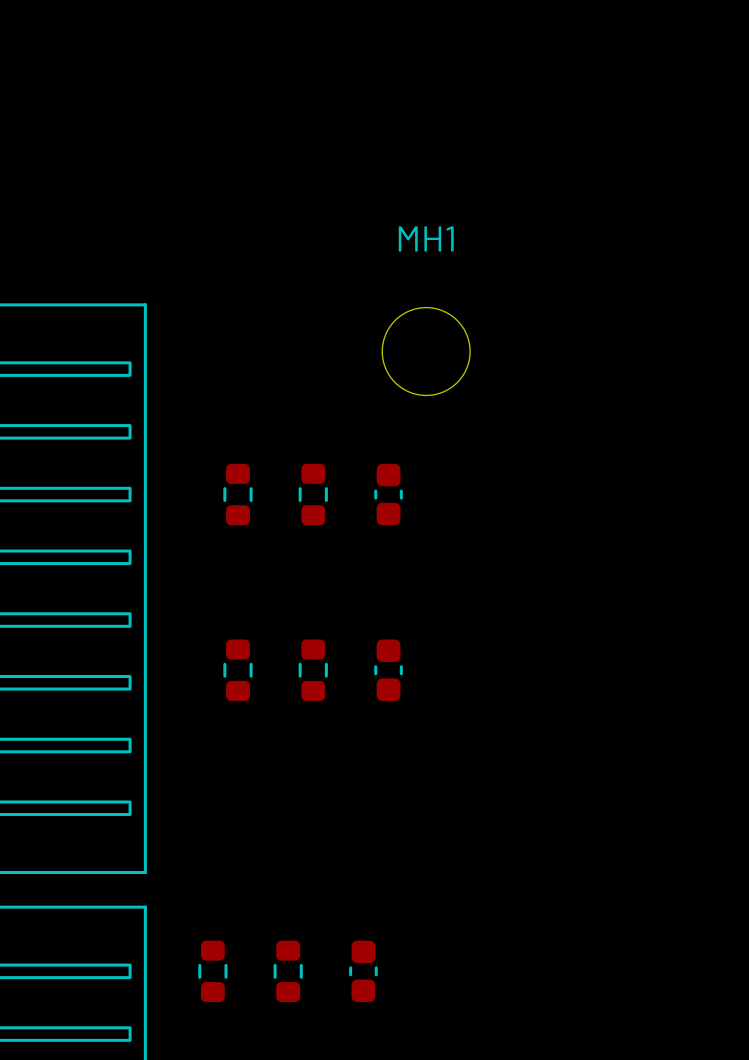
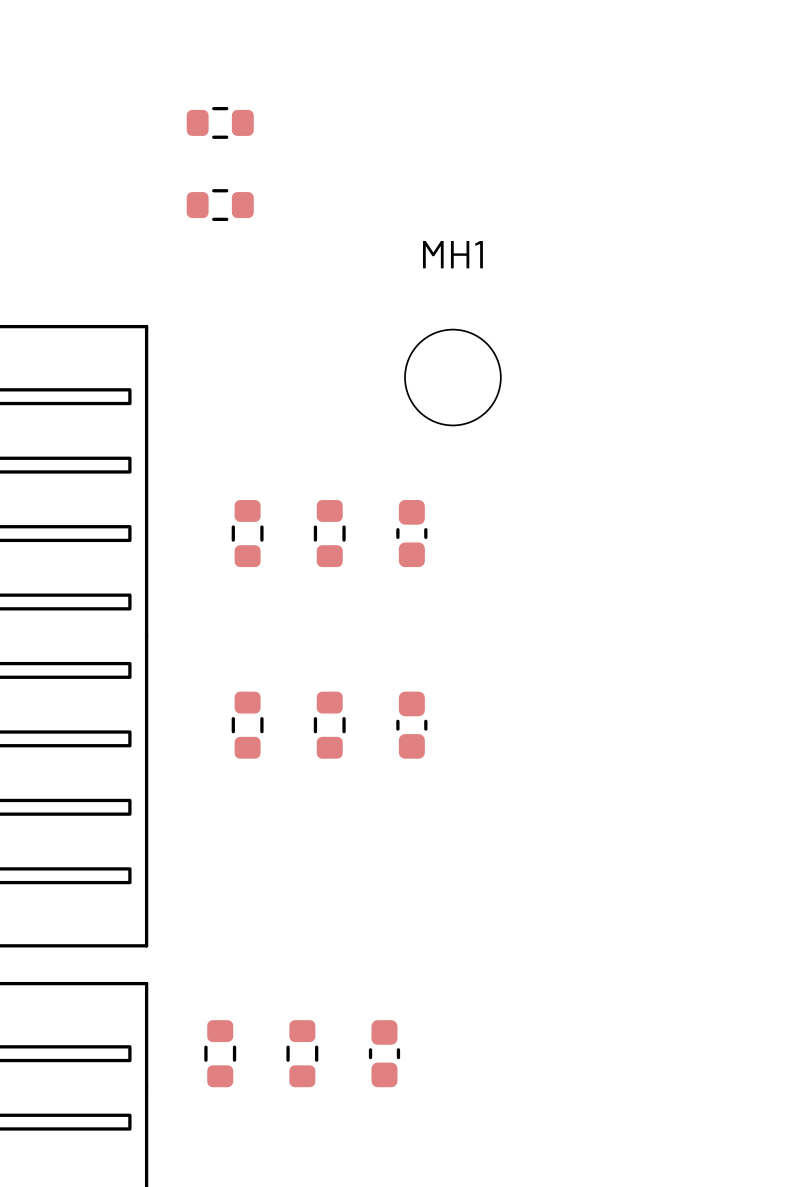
part: none -> (220, 122)
part: none -> (220, 205)

